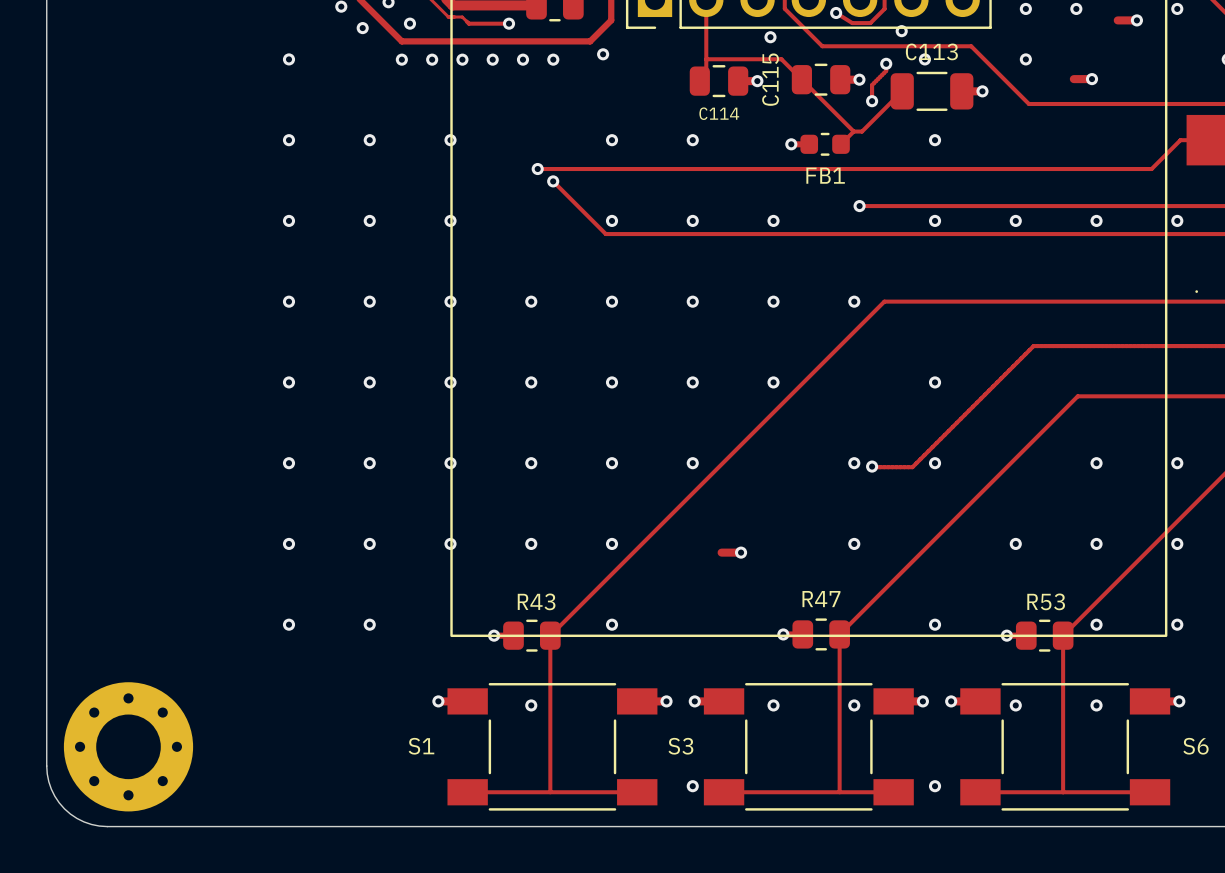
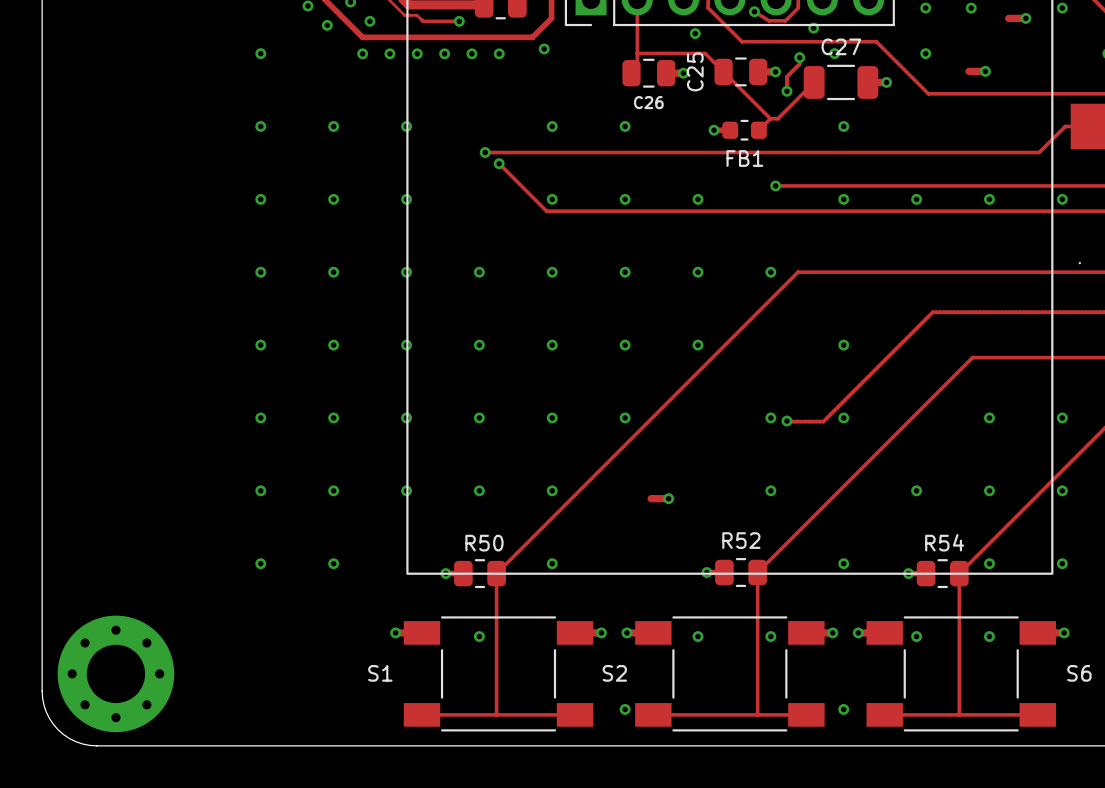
C113 name: C113 (931, 51) -> C27 (841, 46)
C115 name: C115 (770, 79) -> C25 (695, 71)
C114 name: C114 (719, 113) -> C26 (648, 102)
R47 name: R47 (821, 599) -> R52 (741, 540)
R43 name: R43 (536, 601) -> R50 (484, 543)
R53 name: R53 (1046, 601) -> R54 (944, 542)
S3 name: S3 (680, 746) -> S2 (614, 673)

